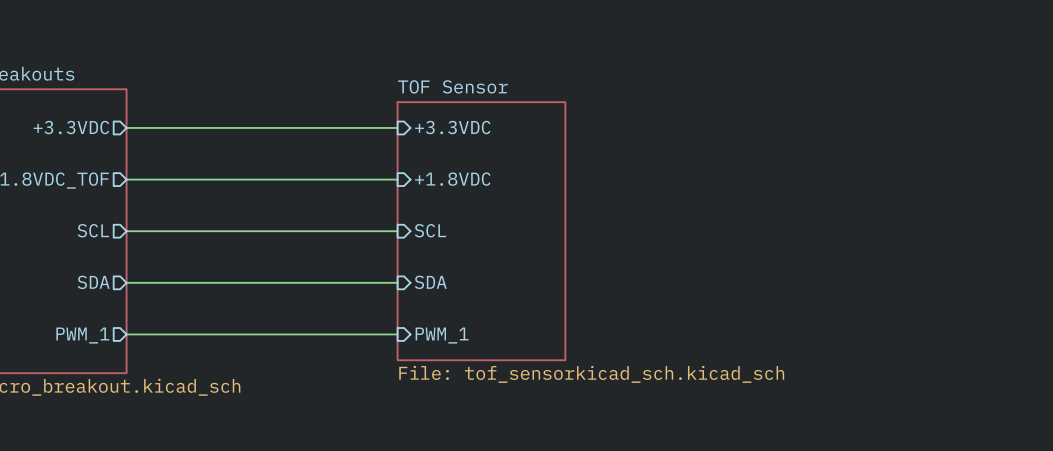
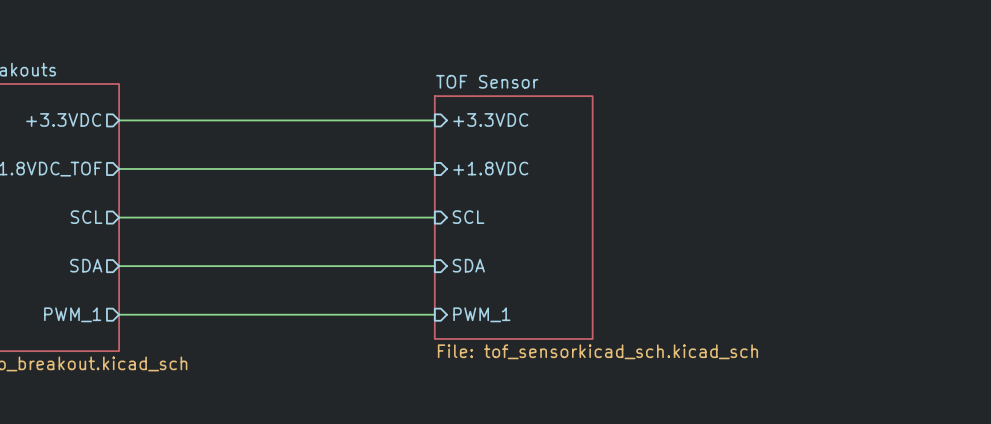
wire: none -> (374, 120) (434, 120)
sheet pin position: +3.3VDC (452, 127) -> +3.3VDC (490, 119)
wire: none -> (374, 168) (434, 168)
sheet pin position: +1.8VDC (452, 179) -> +1.8VDC (490, 168)
sheet pin position: SCL (430, 230) -> SCL (468, 217)
wire: none -> (374, 217) (434, 217)
sheet TOF Sensor position: (481, 231) -> (513, 217)
wire: none -> (374, 266) (434, 266)
sheet pin position: SDA (430, 282) -> SDA (468, 265)
wire: none -> (374, 314) (434, 314)
sheet pin position: PWM_1 (442, 335) -> PWM_1 (481, 314)

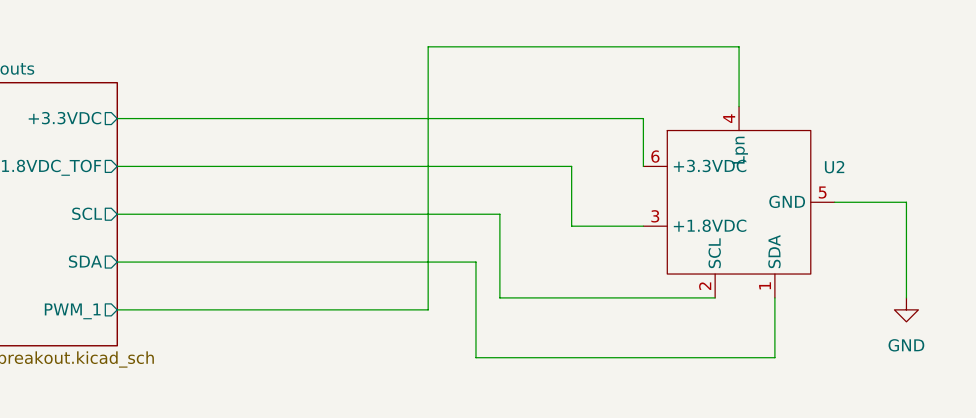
wire: none -> (739, 106) (739, 46) (428, 46) (428, 309)
sheet pin: +3.3VDC (490, 119) -> none
wire: none -> (428, 118) (643, 118) (643, 166)
wire: none -> (428, 166) (571, 166) (571, 226) (643, 226)
sheet pin: +1.8VDC (490, 168) -> none
U2: none -> (739, 202)
wire: none -> (834, 202) (906, 202) (906, 297)
wire: none -> (428, 214) (499, 214) (499, 297) (715, 297)
sheet pin: SCL (468, 217) -> none
sheet TOF Sensor: File: tof_sensorkicad_sch.kicad_sch (513, 217) -> none
sheet pin: SDA (468, 265) -> none
wire: none -> (428, 262) (475, 262) (475, 357) (774, 357) (774, 297)
sheet pin: PWM_1 (481, 314) -> none
power symbol: none -> GND (906, 309)

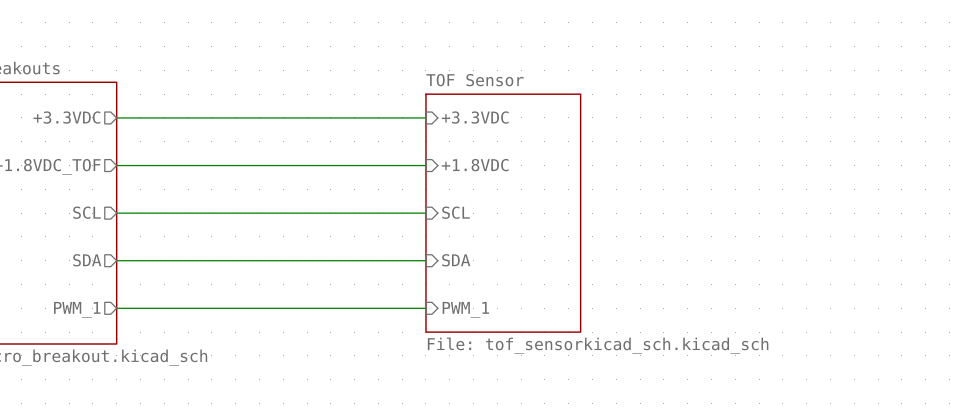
wire: (739, 106) (739, 46) (428, 46) (428, 309) -> none
wire: (428, 118) (643, 118) (643, 166) -> none
sheet pin: none -> +3.3VDC (475, 117)
sheet pin: none -> +1.8VDC (475, 165)
wire: (428, 166) (571, 166) (571, 226) (643, 226) -> none
U2: (739, 202) -> none
wire: (834, 202) (906, 202) (906, 297) -> none
sheet pin: none -> SCL (456, 212)
wire: (428, 214) (499, 214) (499, 297) (715, 297) -> none
sheet TOF Sensor: none -> File: tof_sensorkicad_sch.kicad_sch (503, 213)
sheet pin: none -> SDA (456, 260)
wire: (428, 262) (475, 262) (475, 357) (774, 357) (774, 297) -> none
power symbol: GND (906, 309) -> none
sheet pin: none -> PWM_1 (465, 309)

